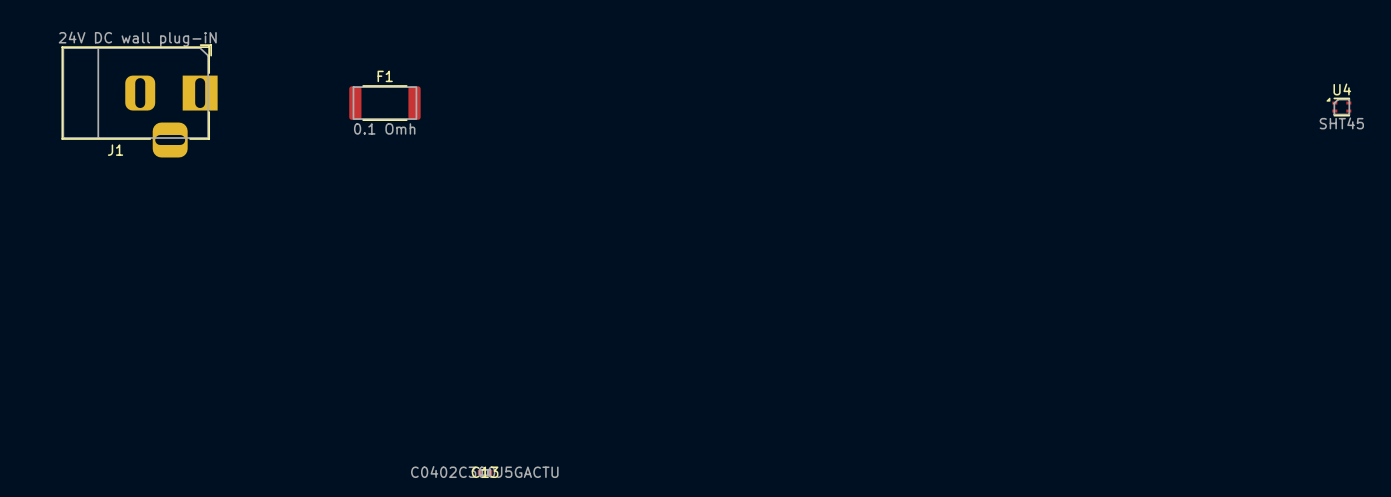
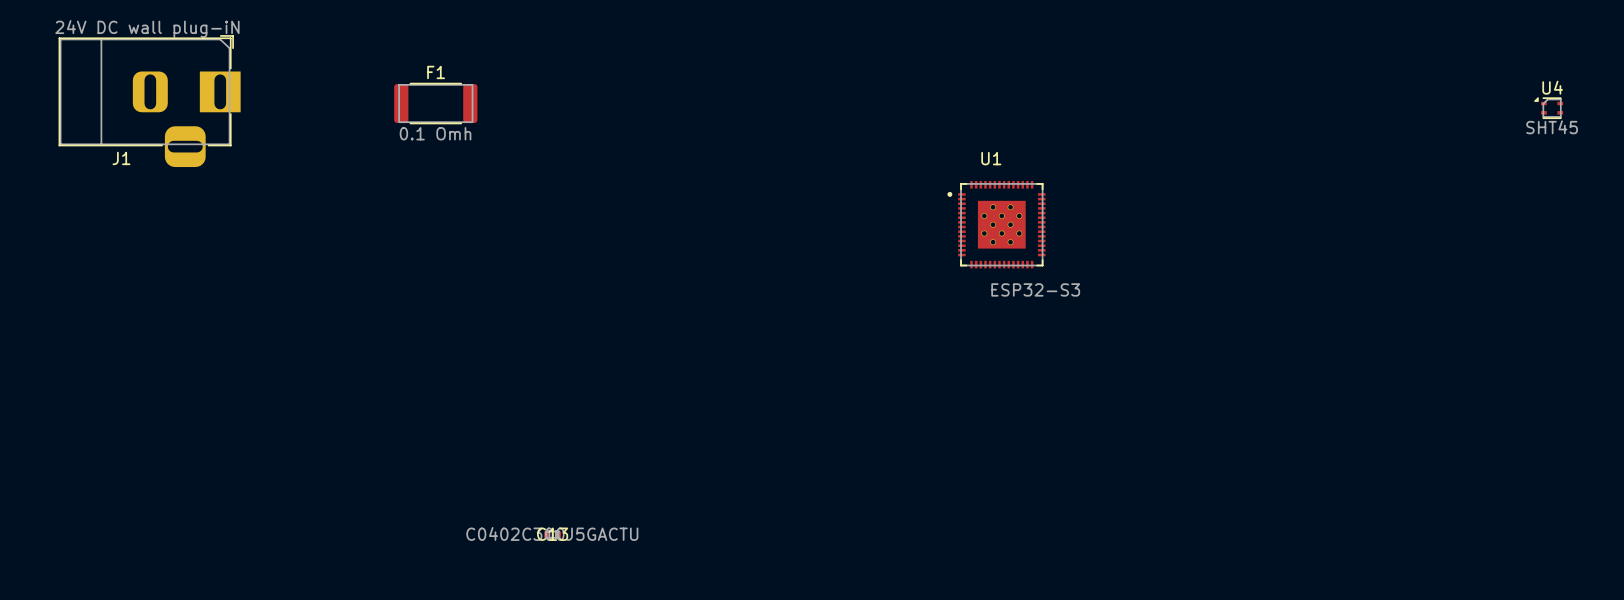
U1: none -> ESP32-S3 (996, 224)

